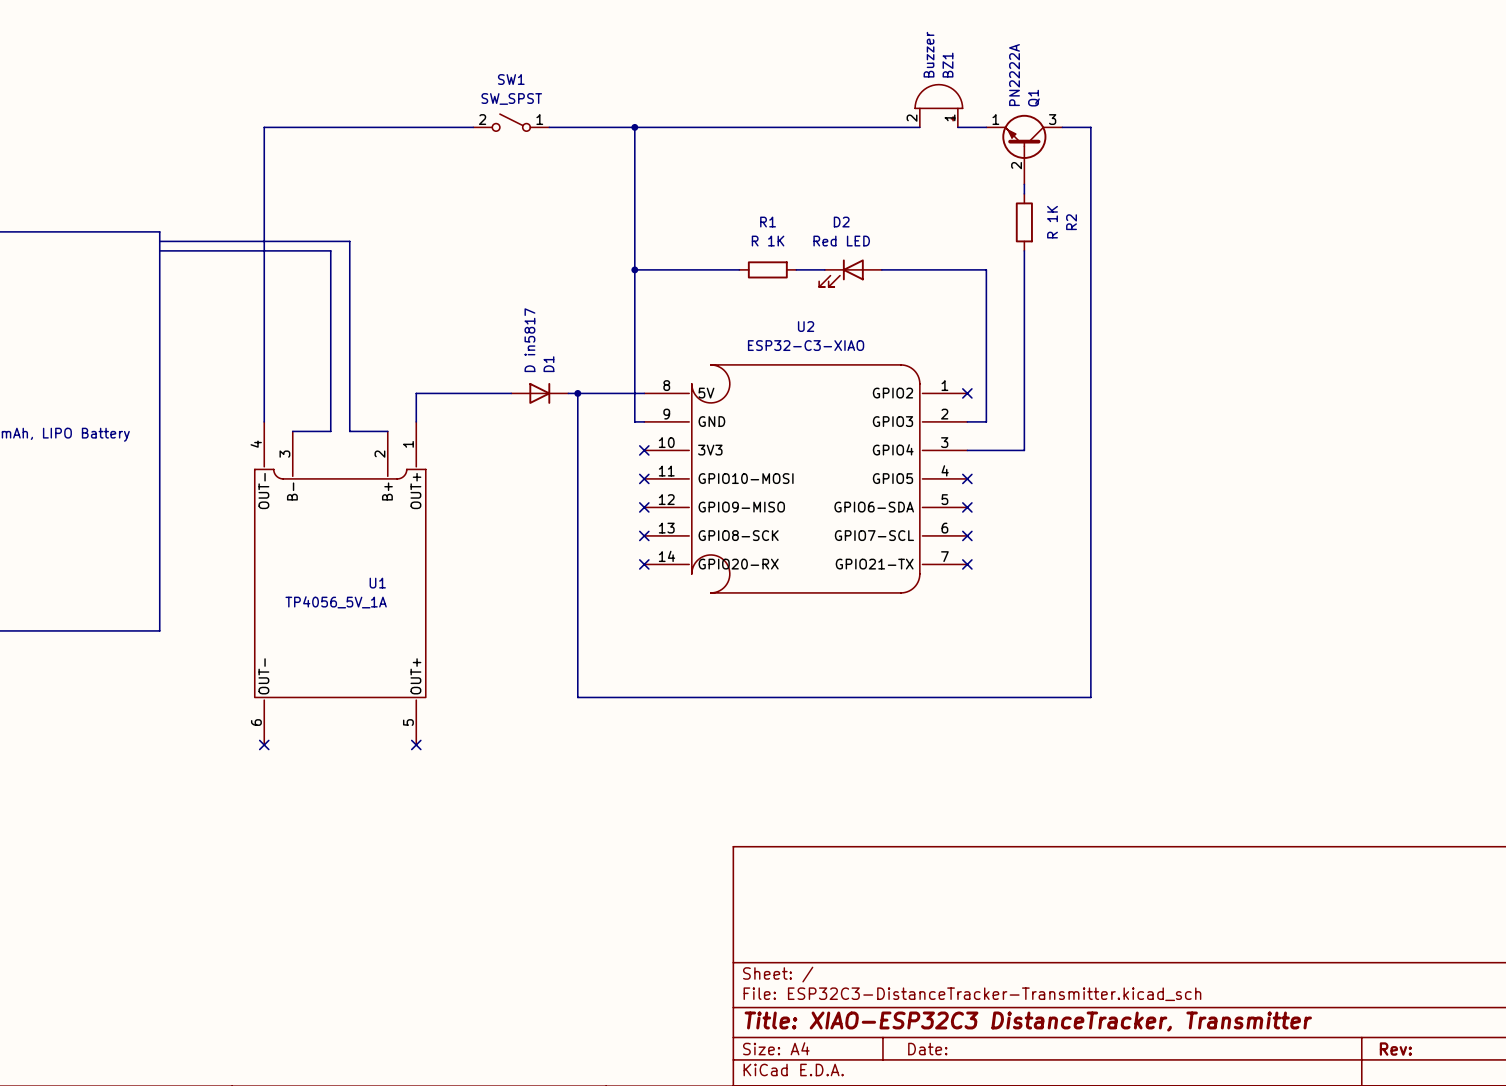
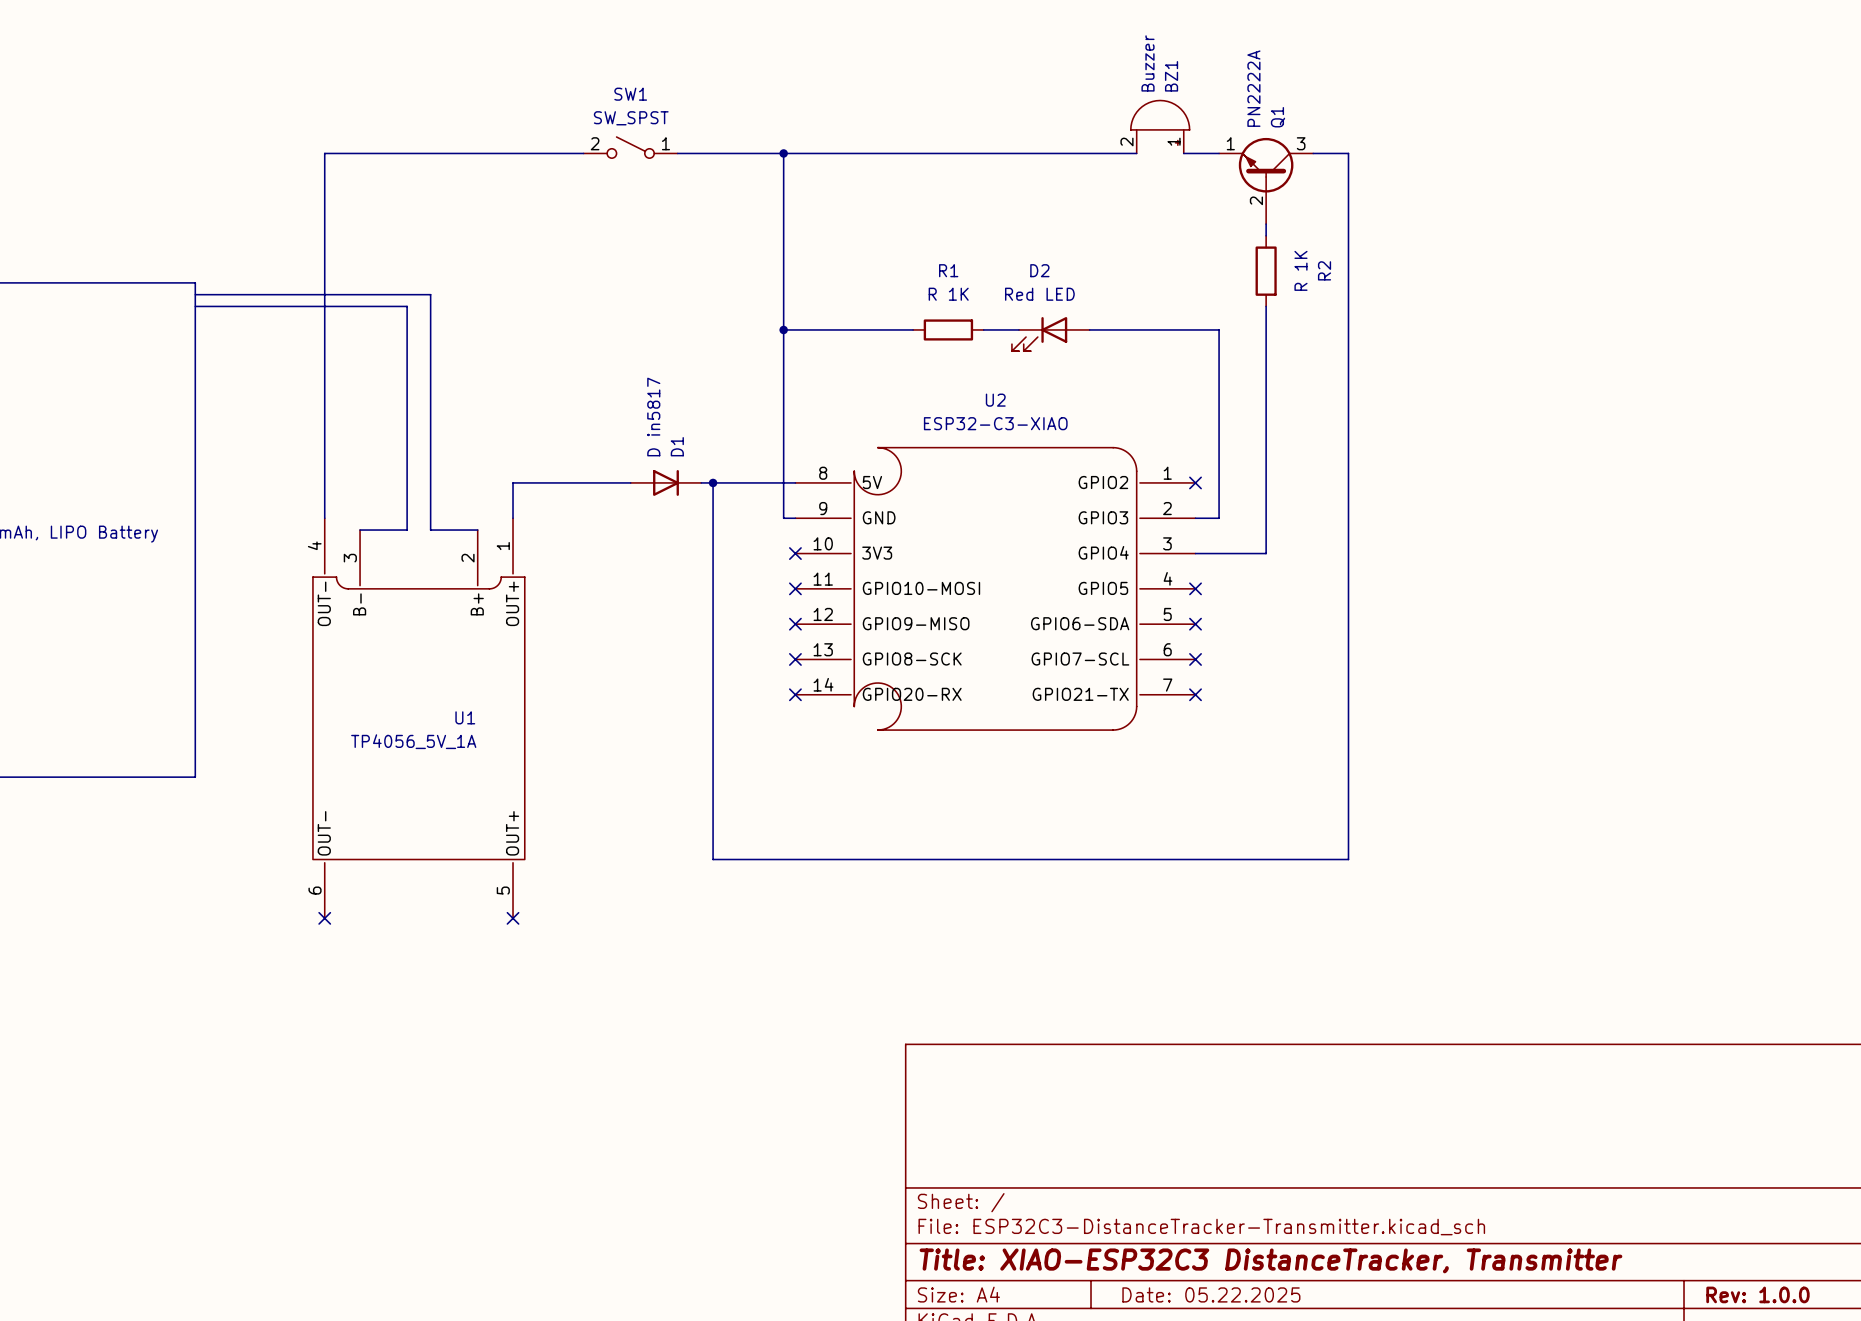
title block: Date: (927, 1049) -> Date: 05.22.2025 (1211, 1294)
title block: Rev: (1395, 1049) -> Rev: 1.0.0 (1757, 1294)

